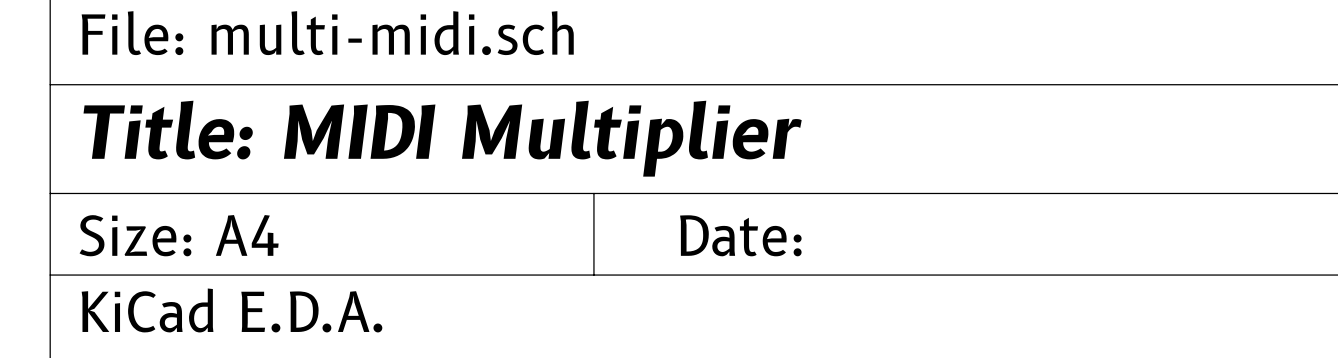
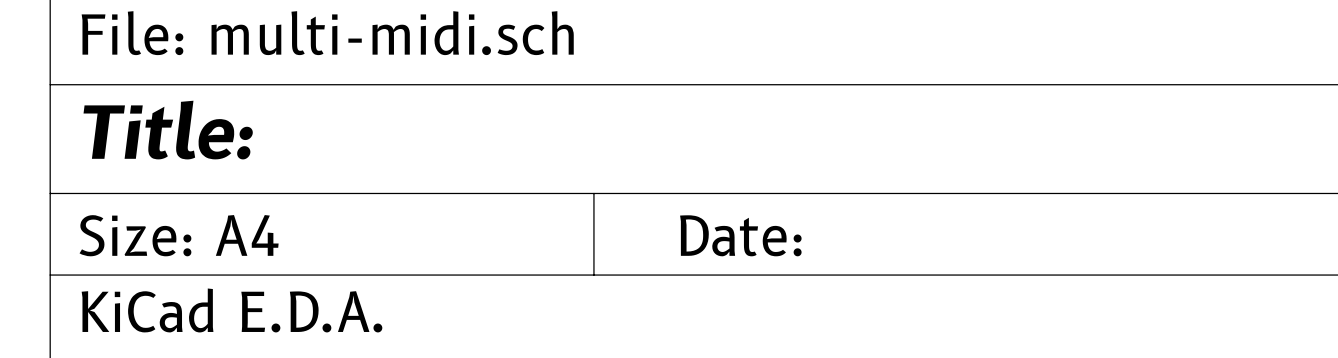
title block: Title: MIDI Multiplier (442, 138) -> Title: (168, 130)

